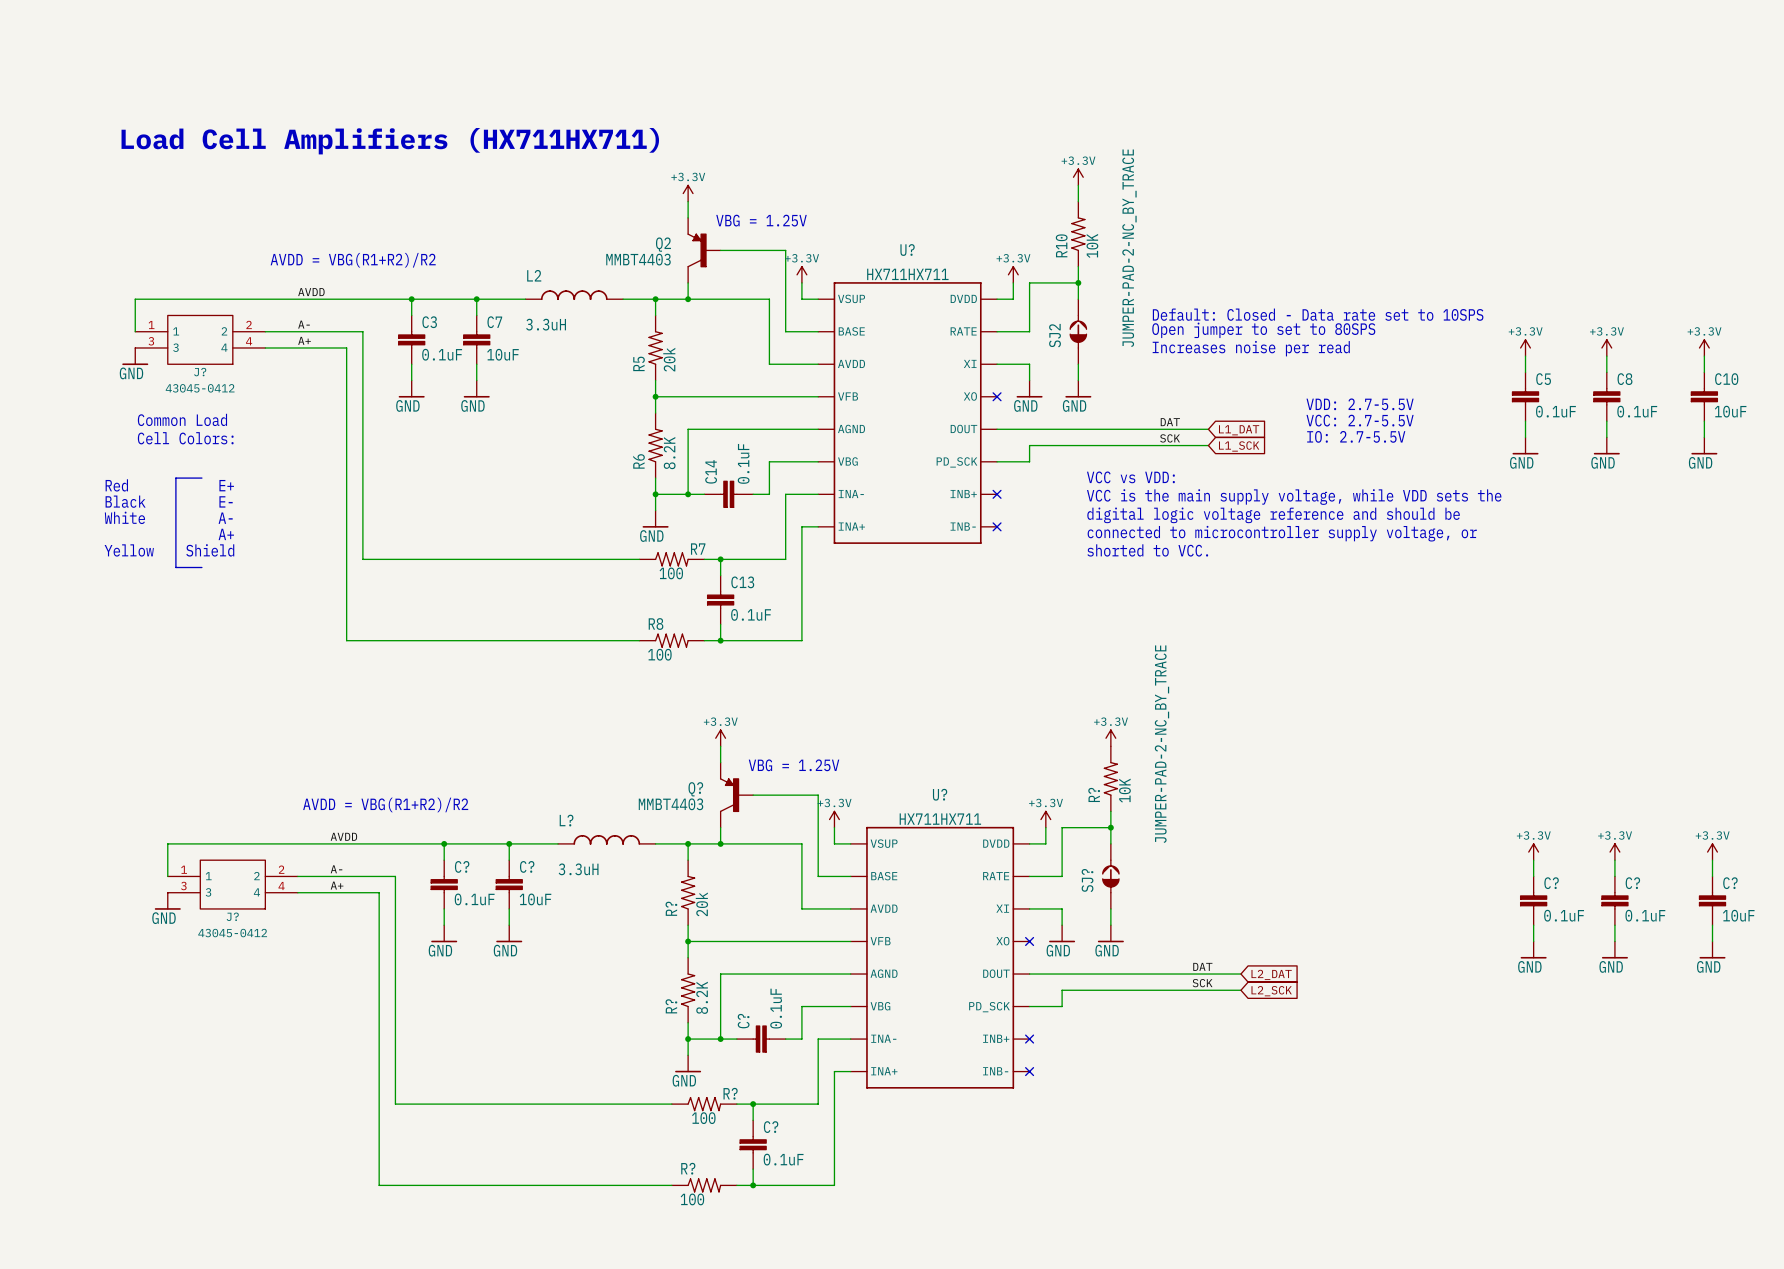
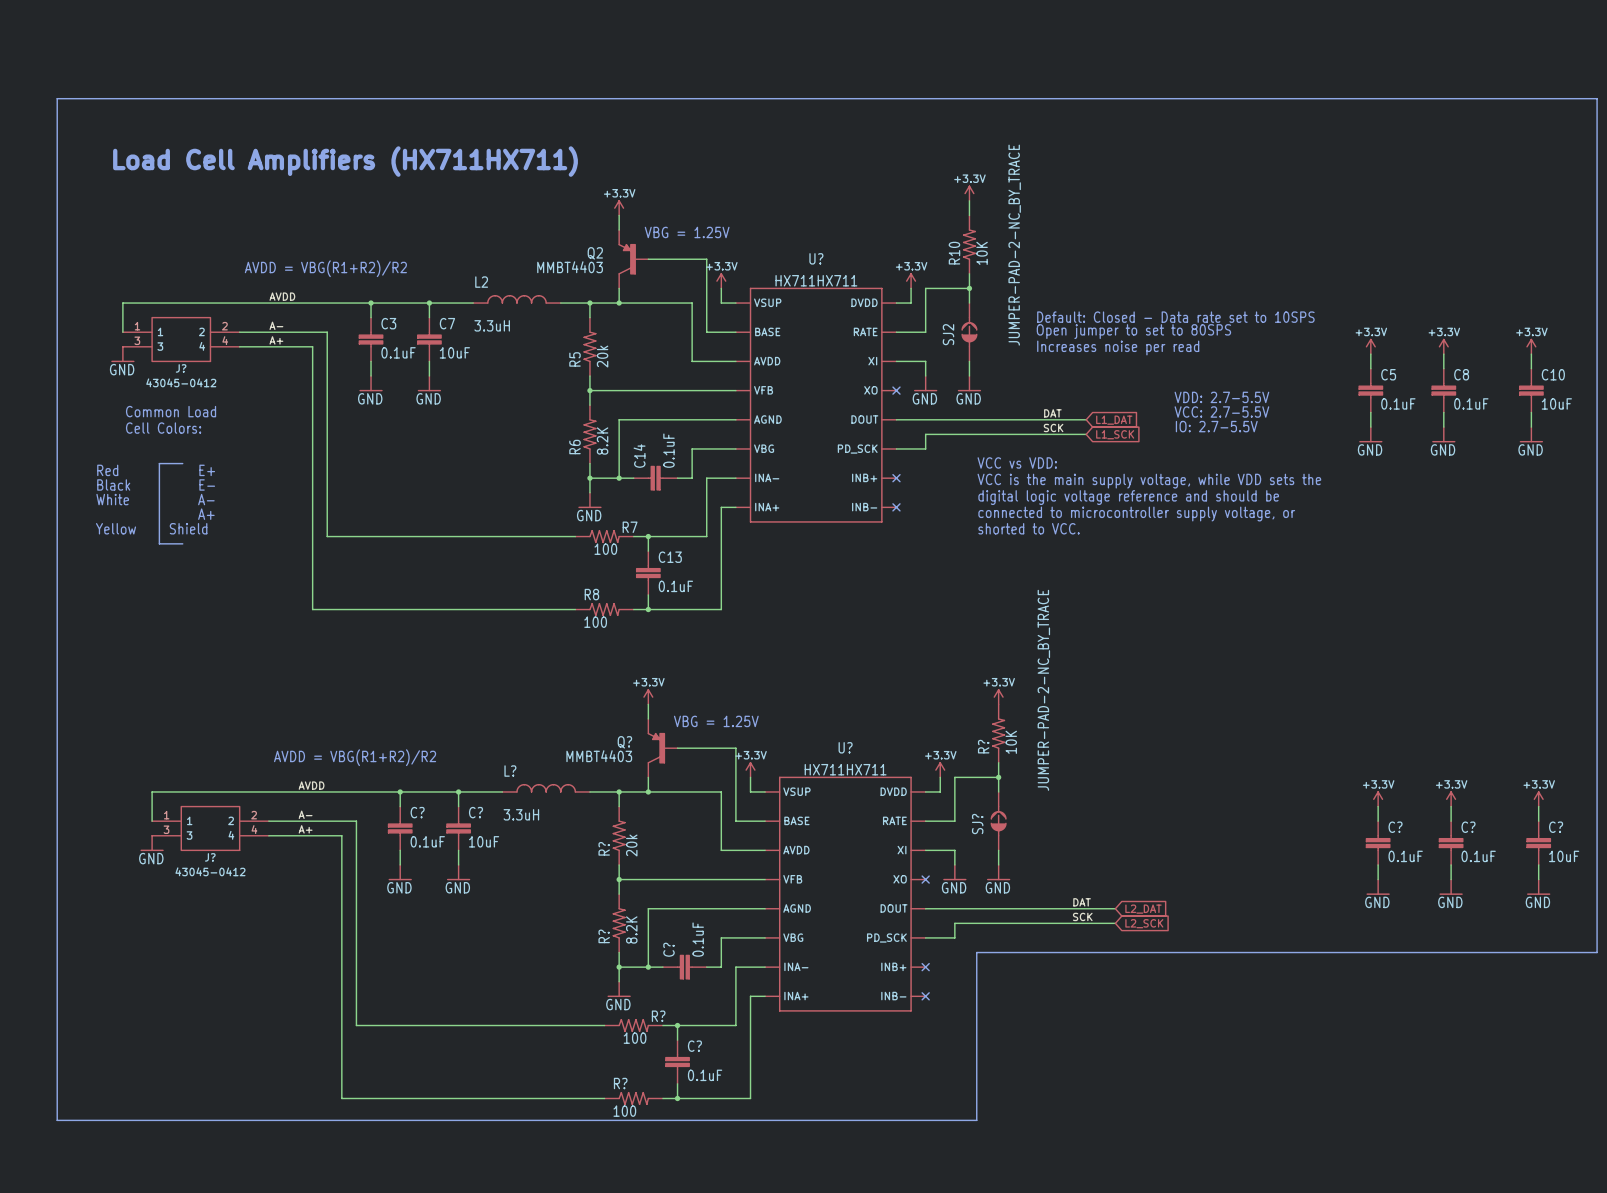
line: none -> (57, 98) (1597, 98) (1597, 952) (976, 952) (976, 1120) (57, 1120) (57, 98)

